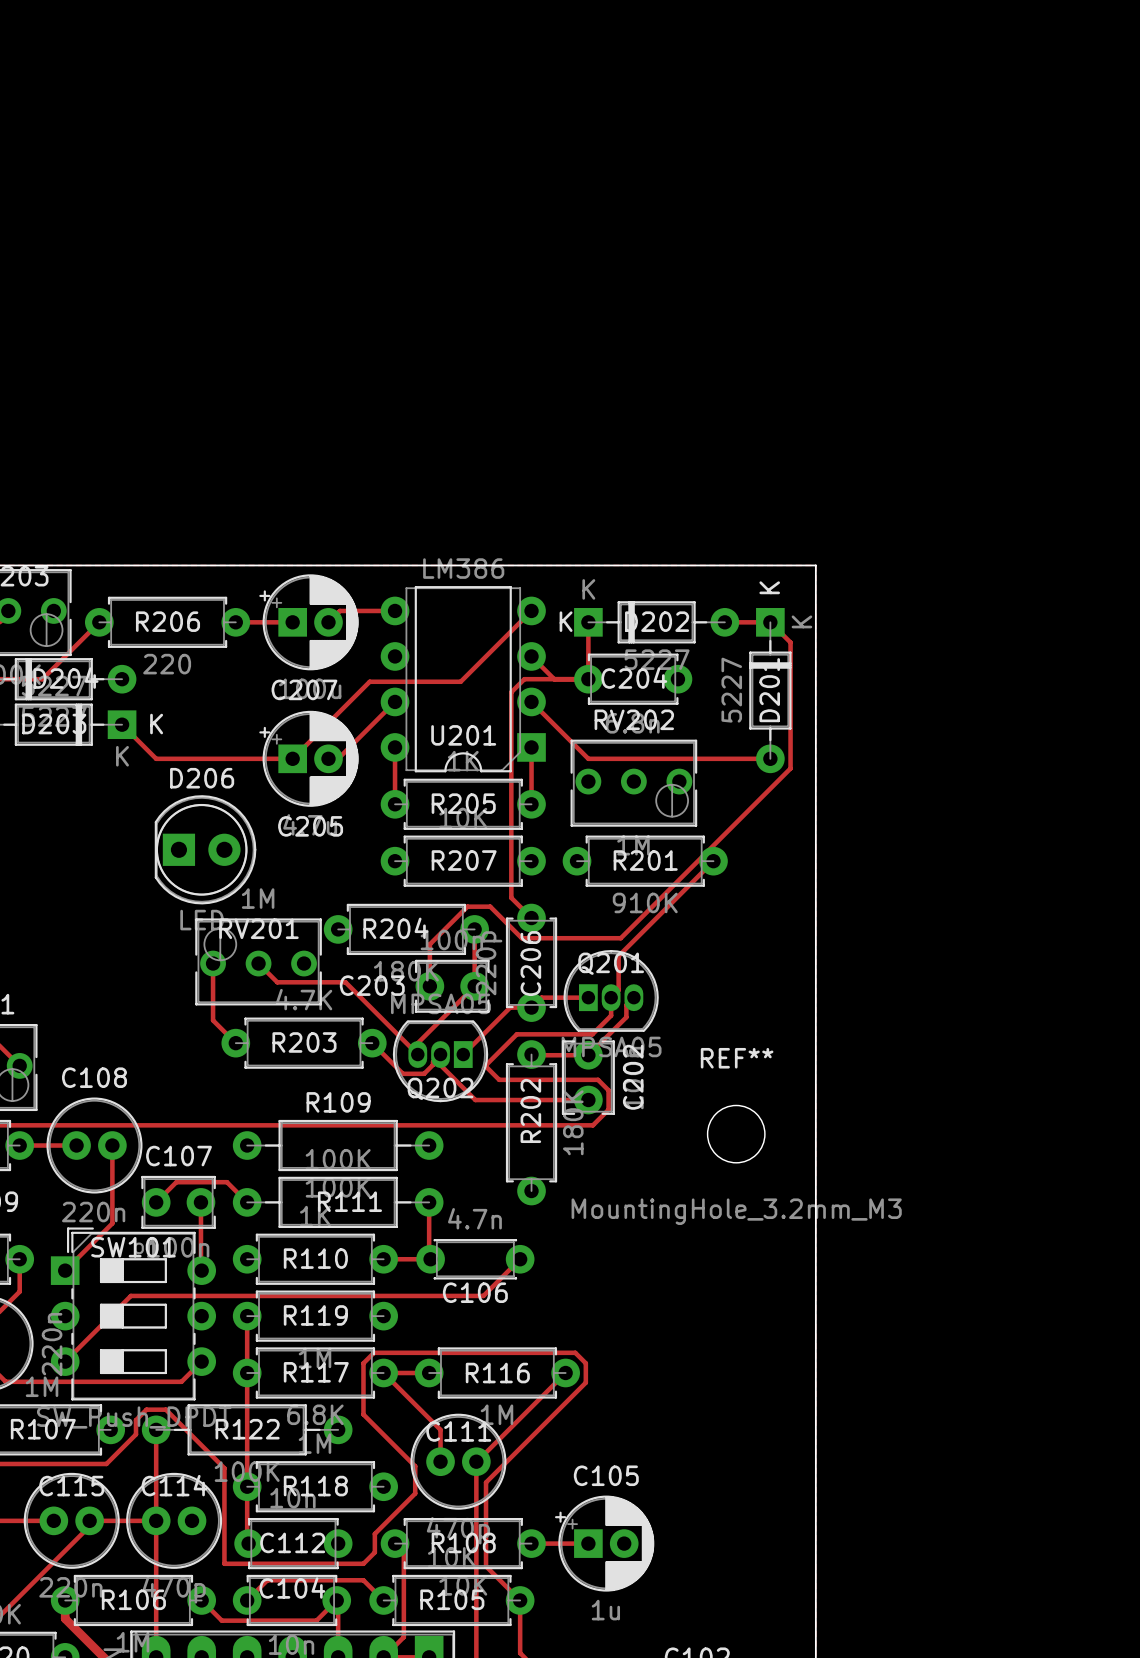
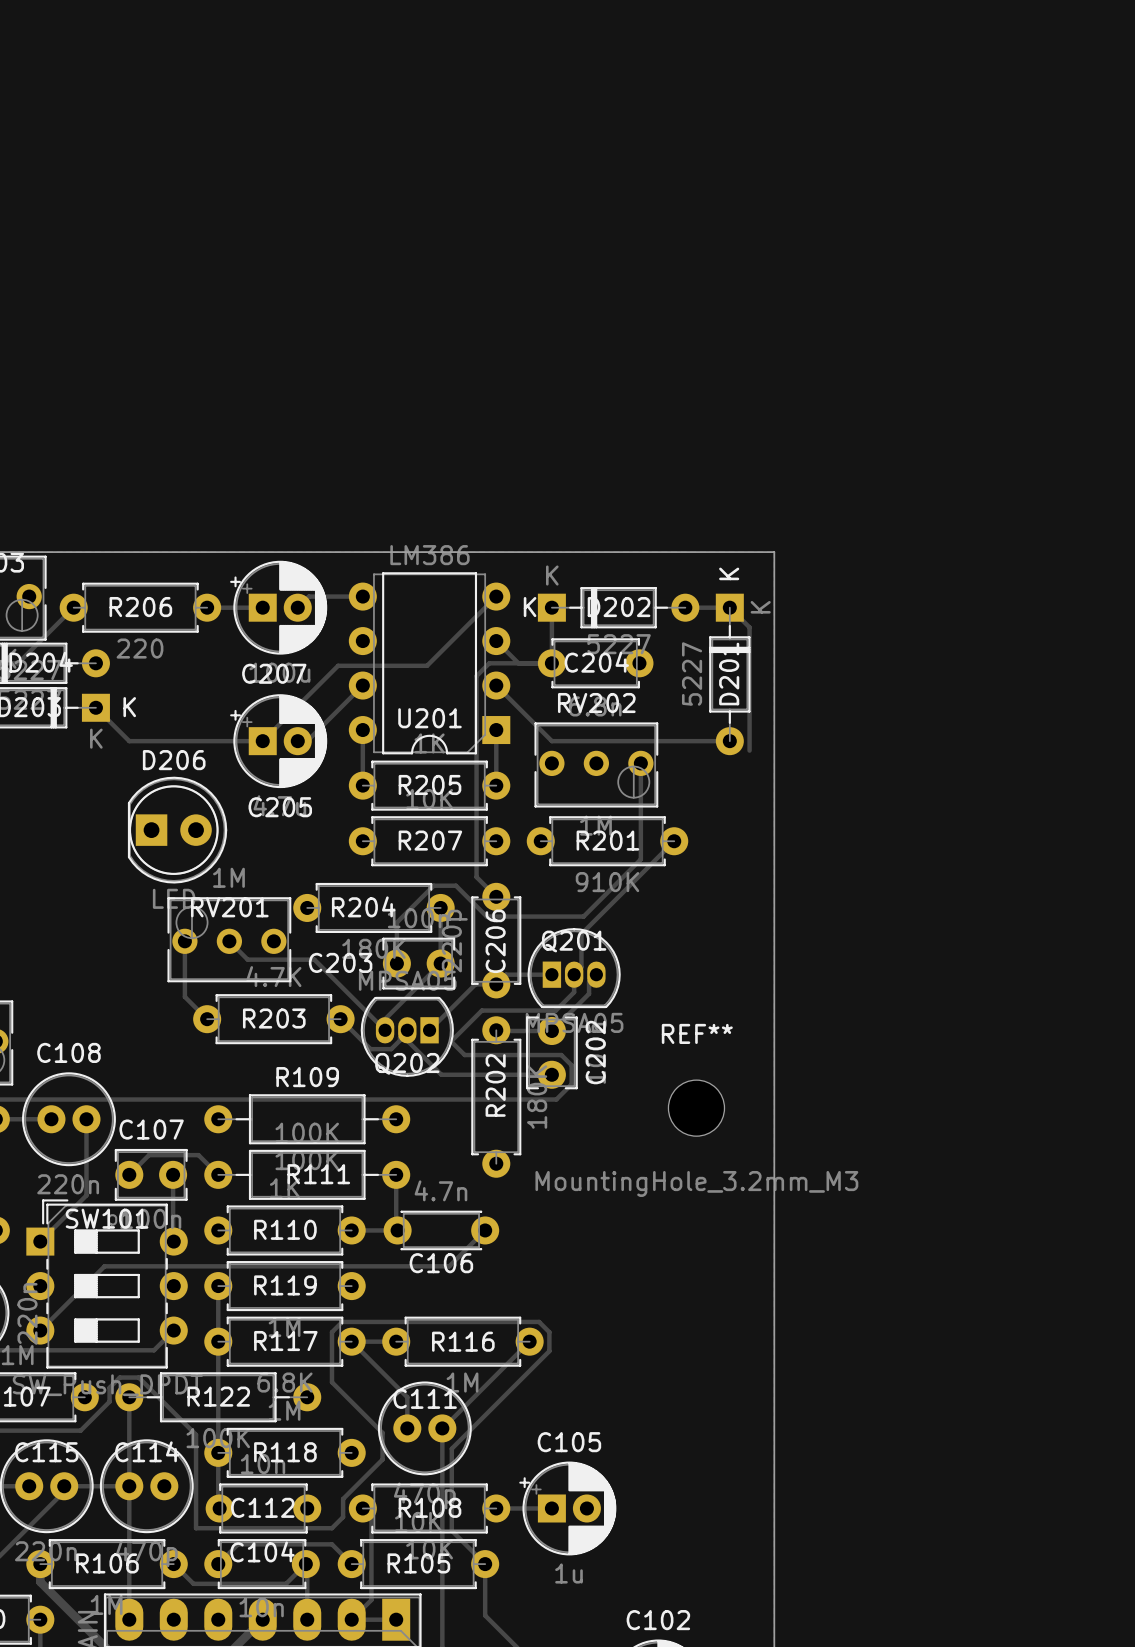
track: (790, 768) (679, 879) -> (640, 763) (640, 859)

